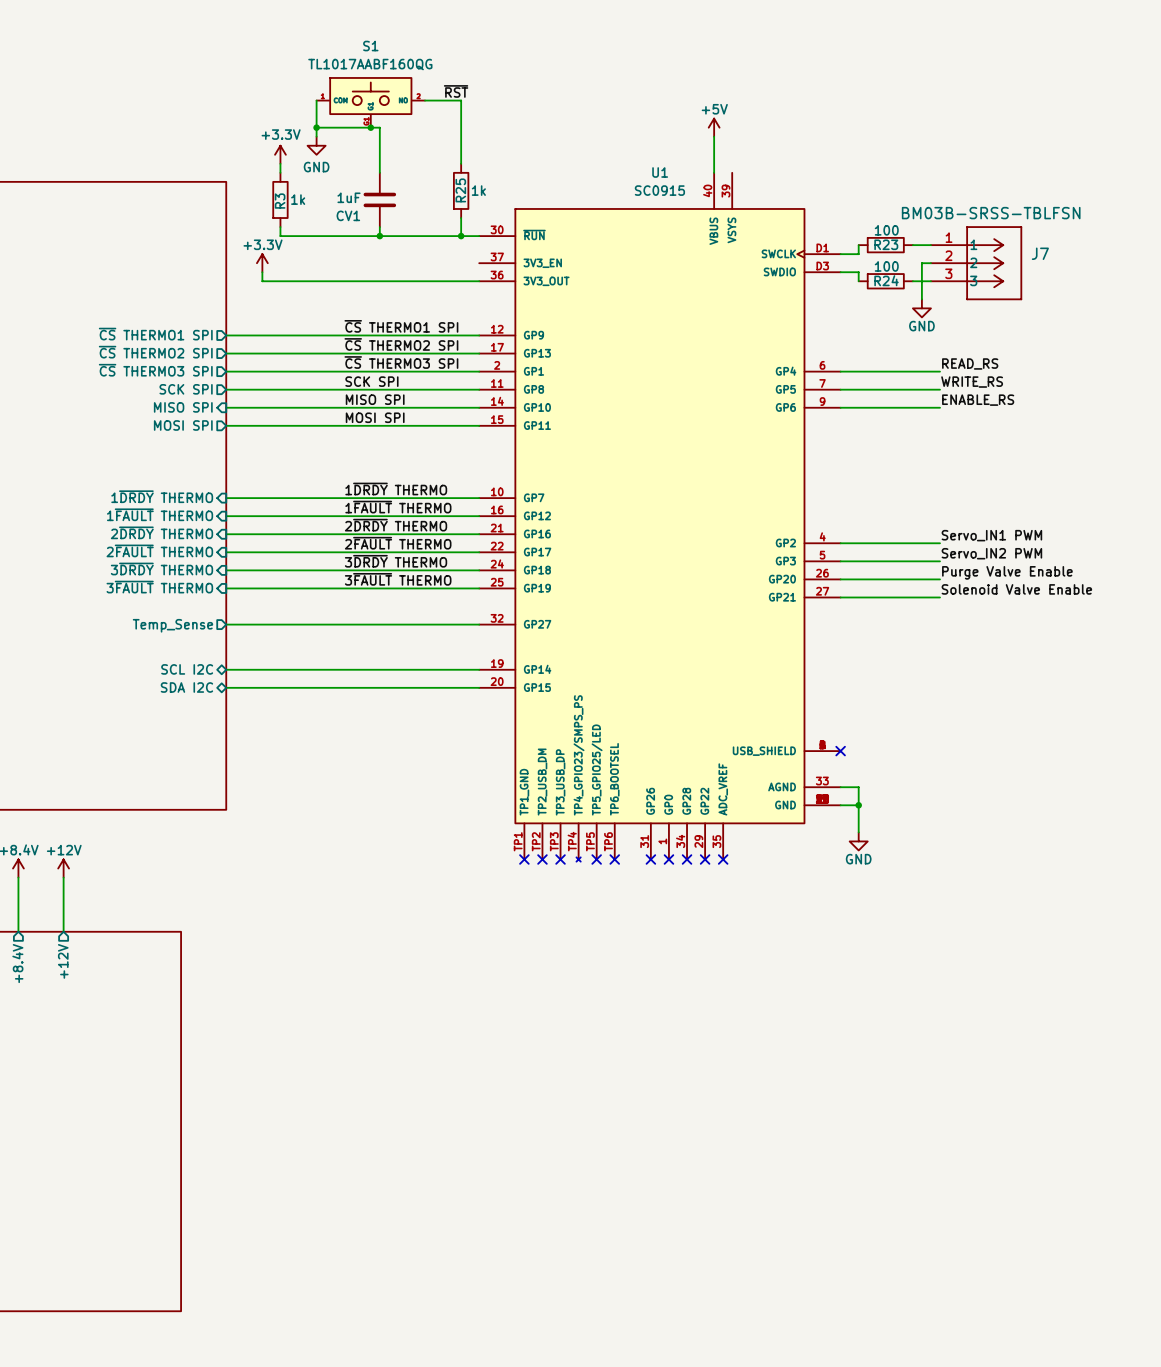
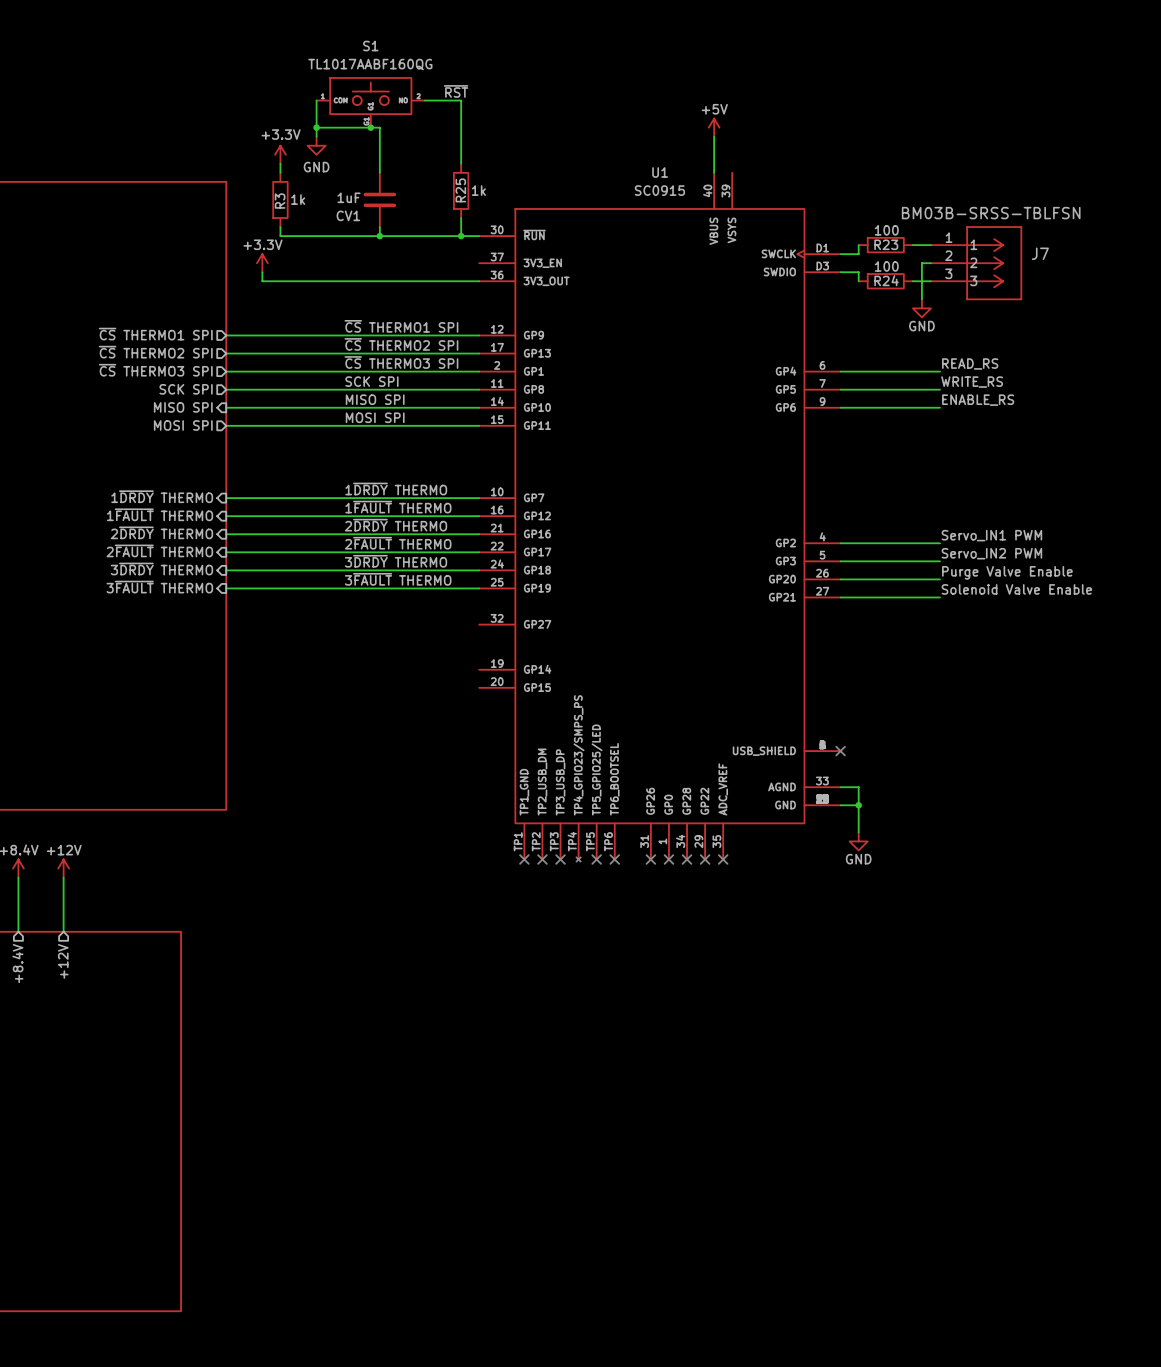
wire: (226, 624) (479, 624) -> none
sheet pin: Temp_Sense (172, 625) -> none
sheet pin: SCL I2C (187, 669) -> none
wire: (226, 669) (479, 669) -> none
sheet pin: SDA I2C (186, 687) -> none
wire: (226, 687) (479, 687) -> none

